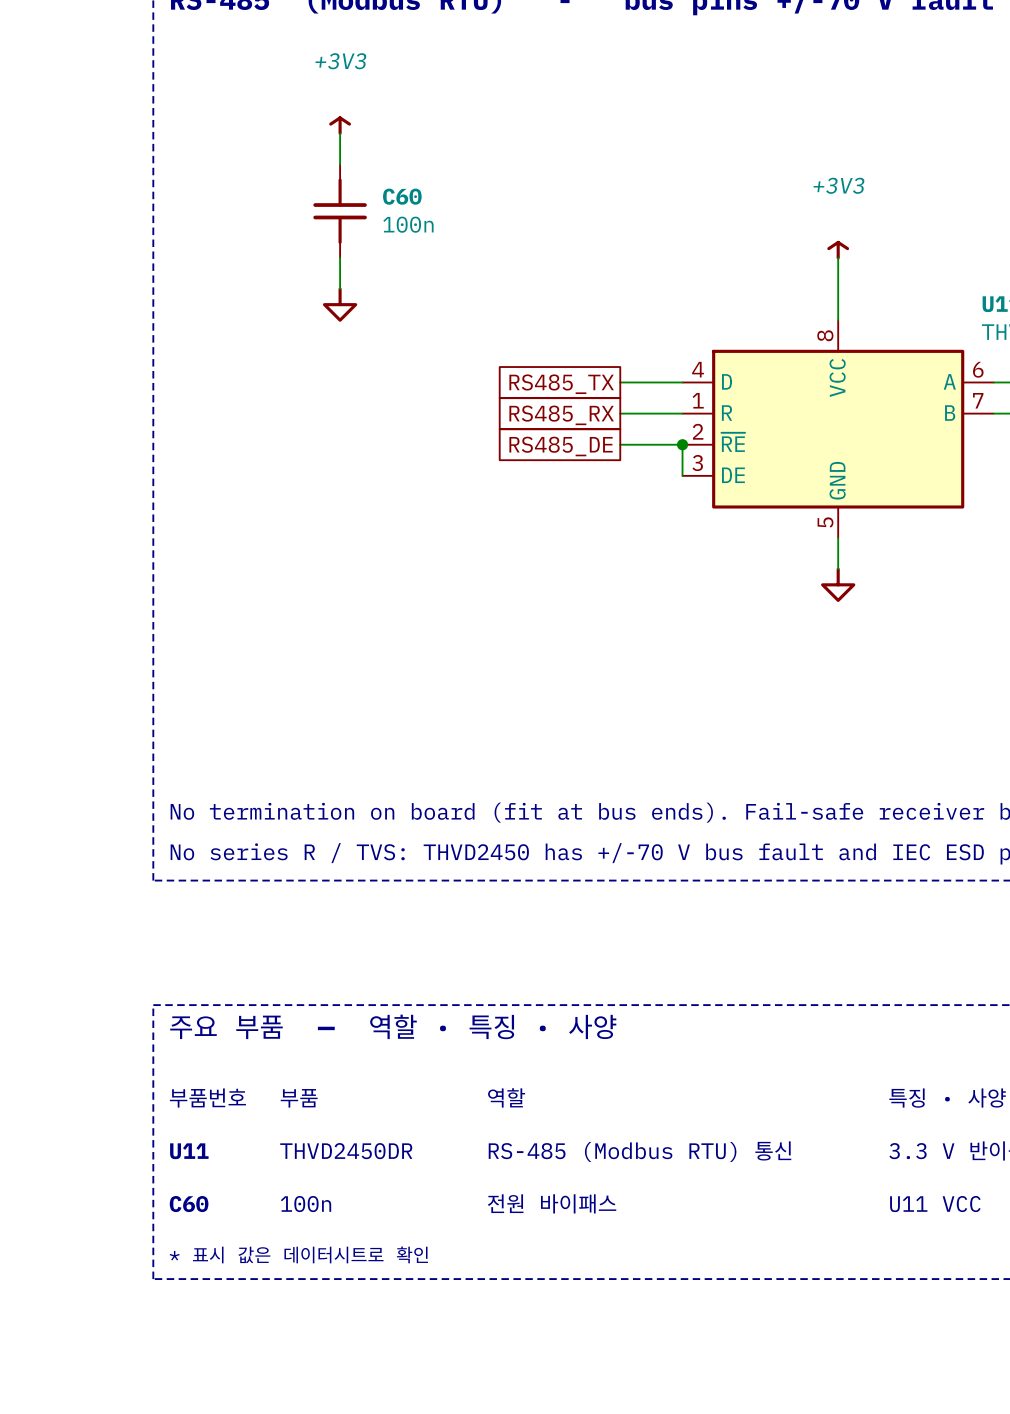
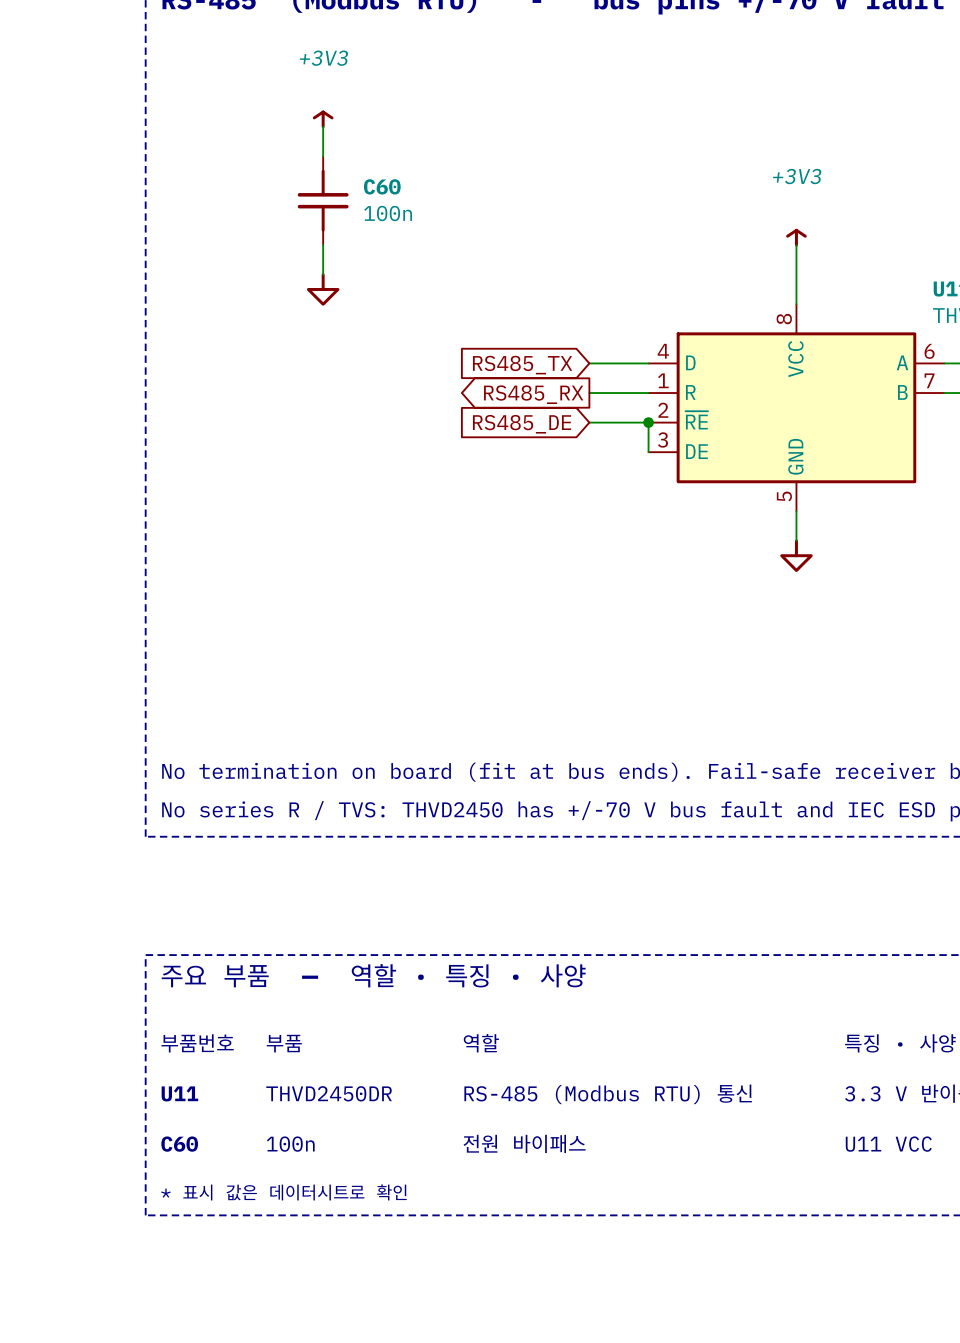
global label shape: passive (561, 384) -> input (522, 365)
global label shape: passive (561, 415) -> output (533, 394)
global label shape: passive (561, 446) -> input (522, 424)

